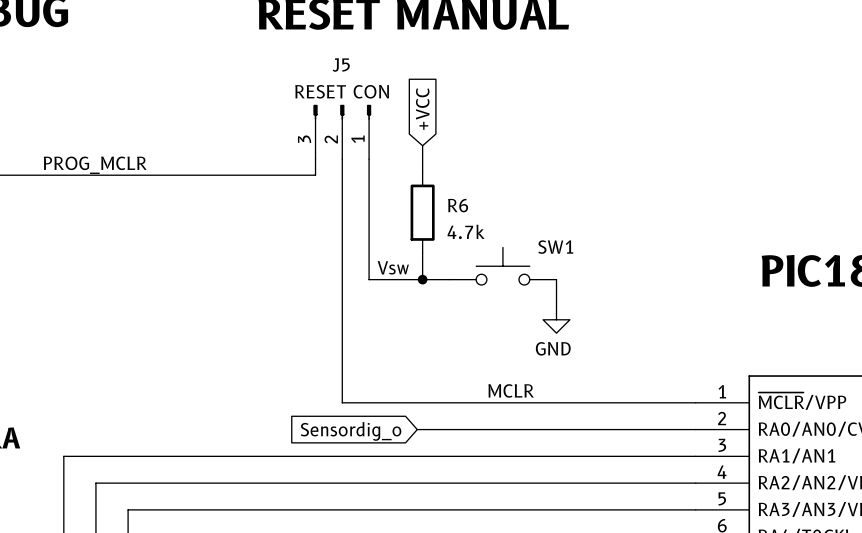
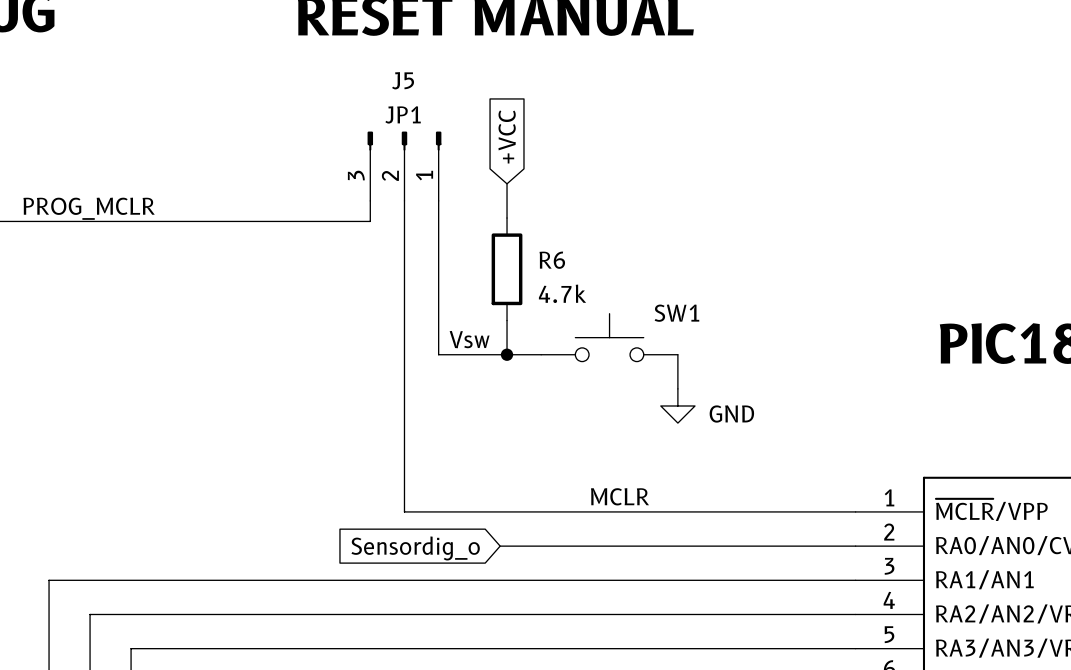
J5 value: RESET CON (342, 91) -> JP1 (403, 114)
power symbol text position: GND (553, 348) -> GND (731, 414)

